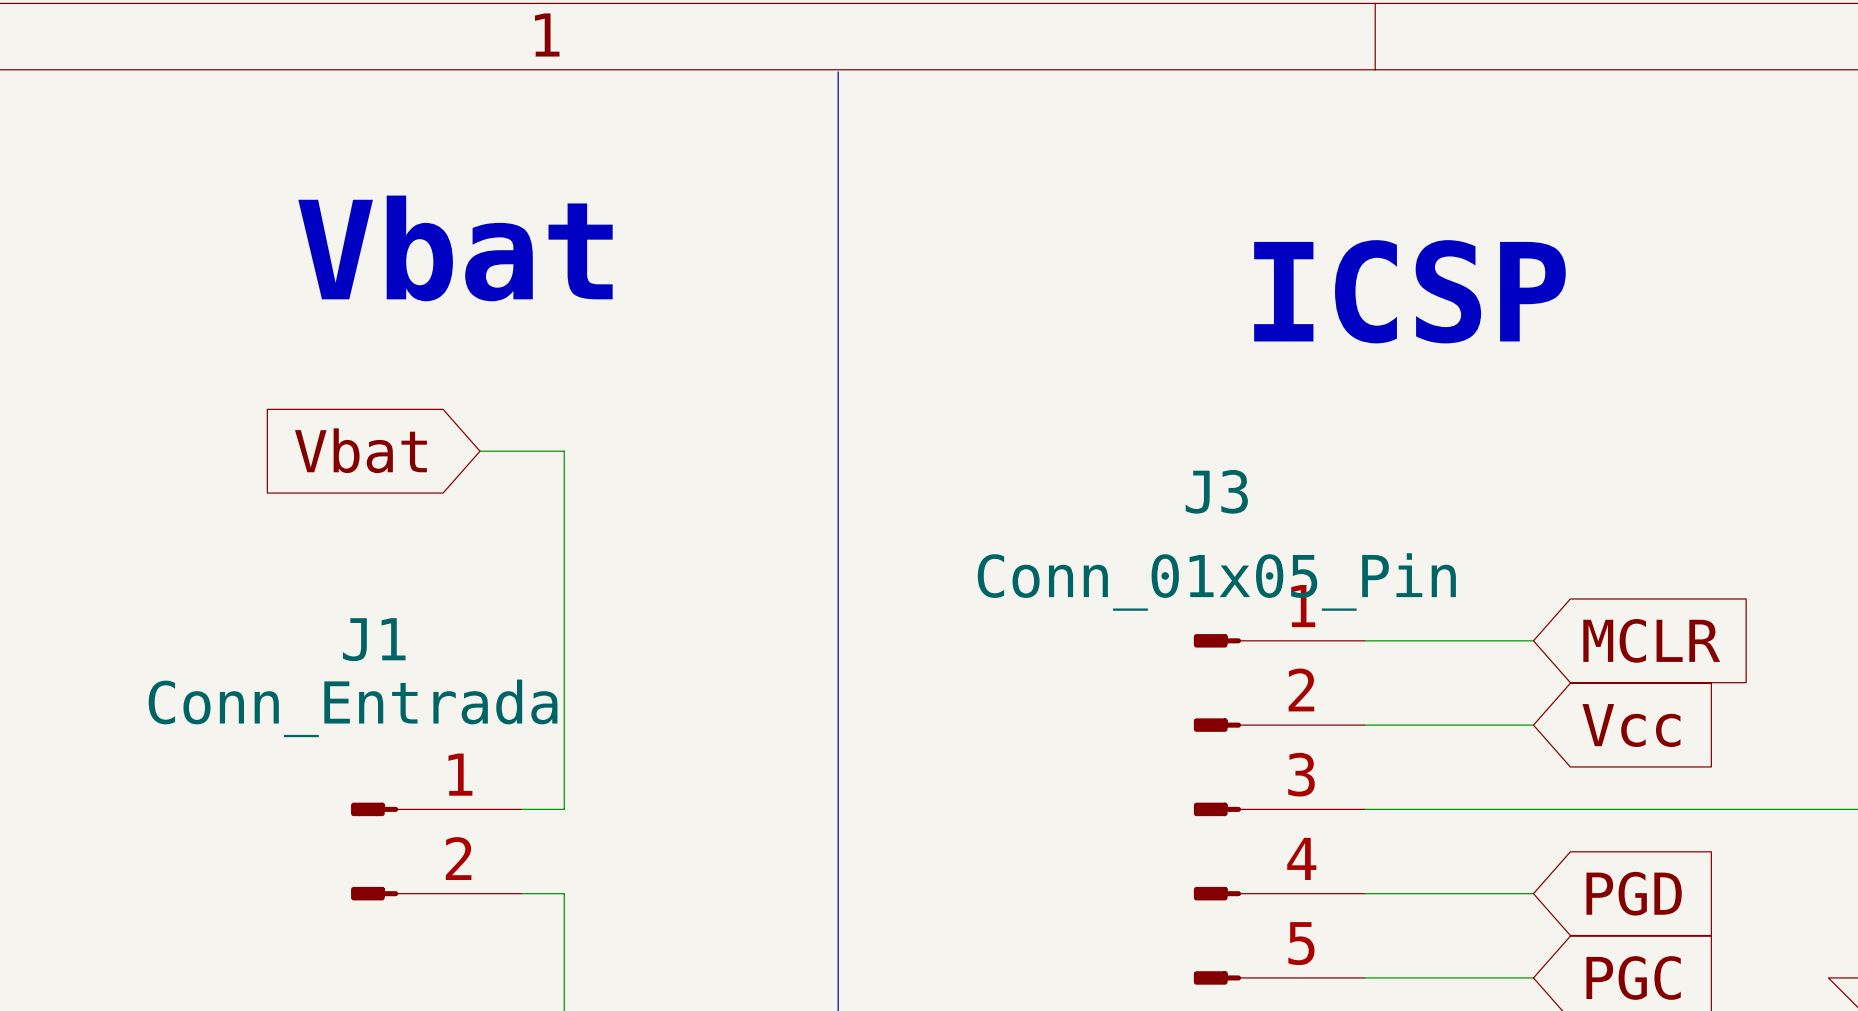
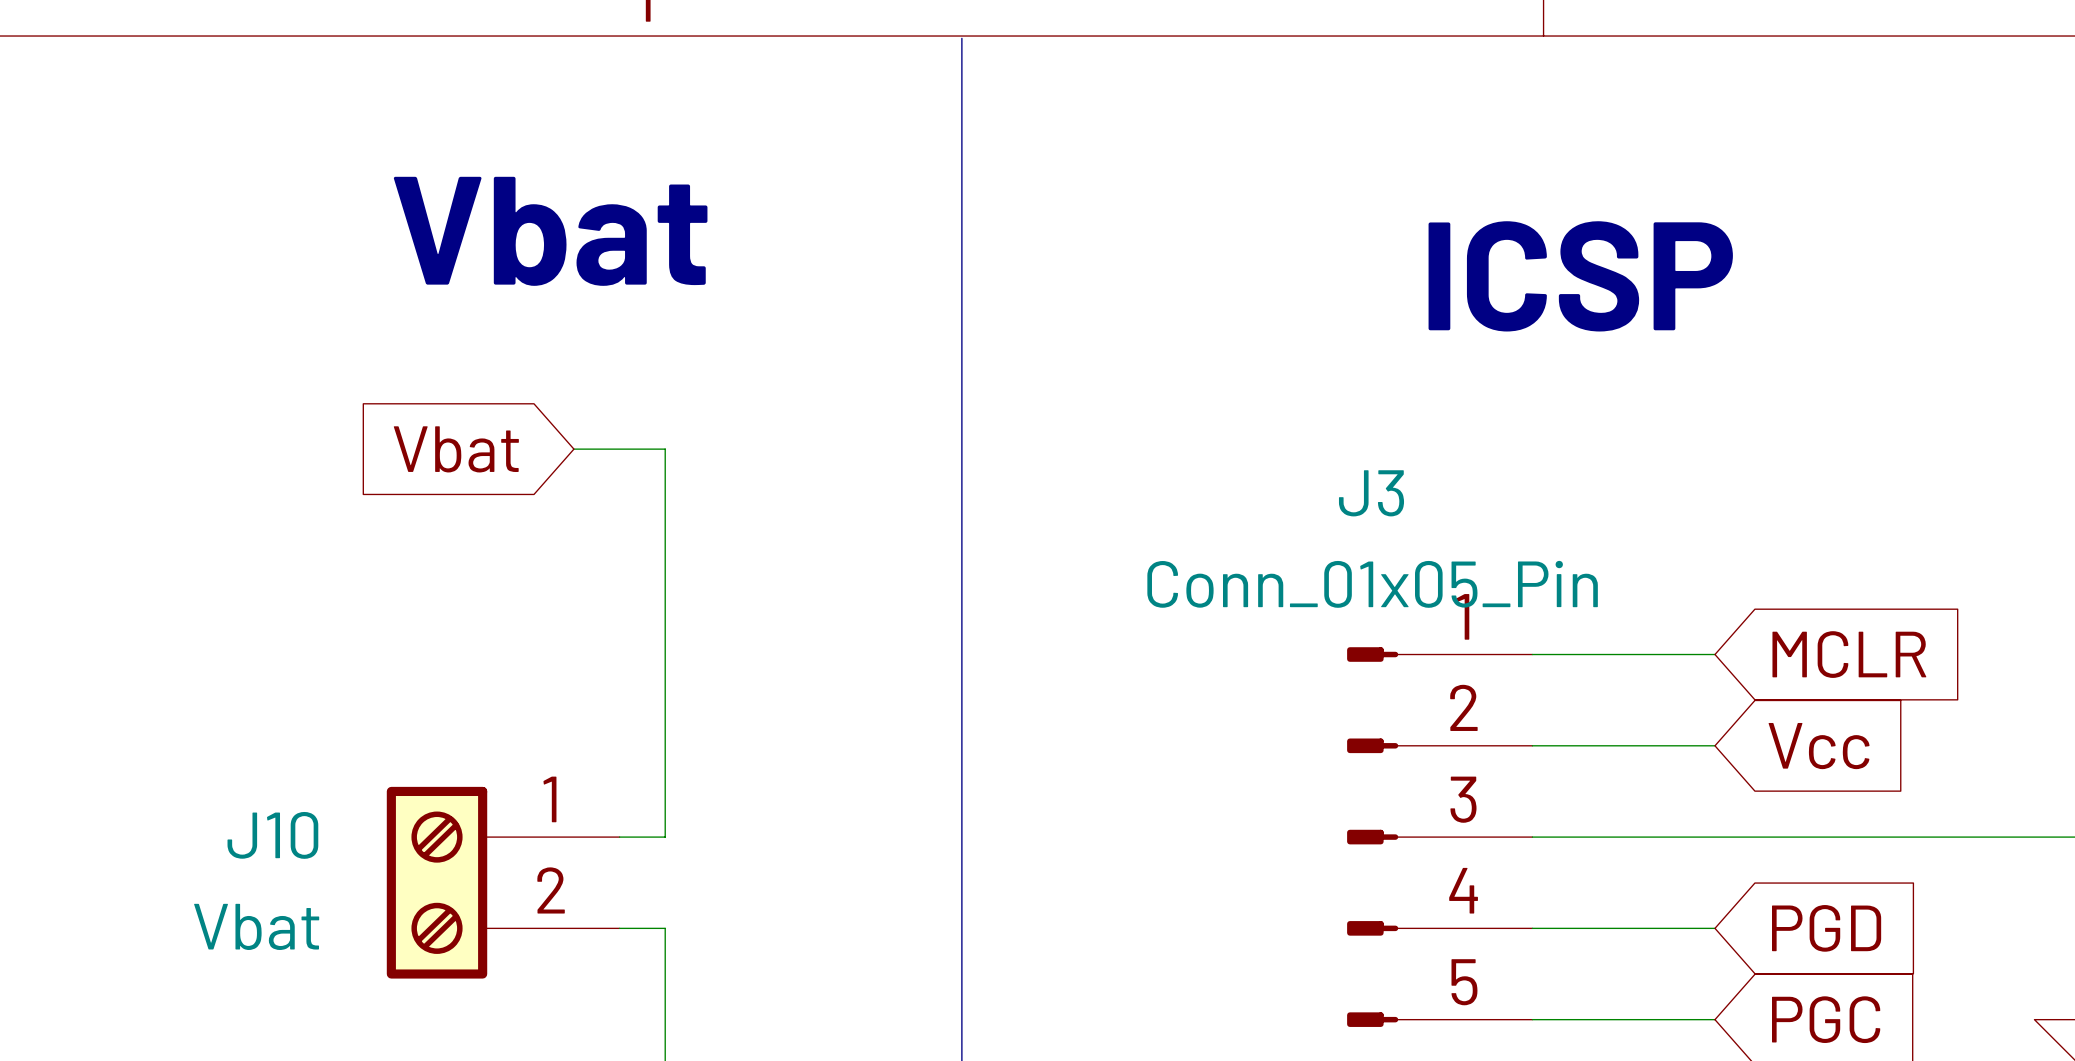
J10: none -> Vbat (503, 882)
J1: Conn_Entrada (436, 851) -> none

